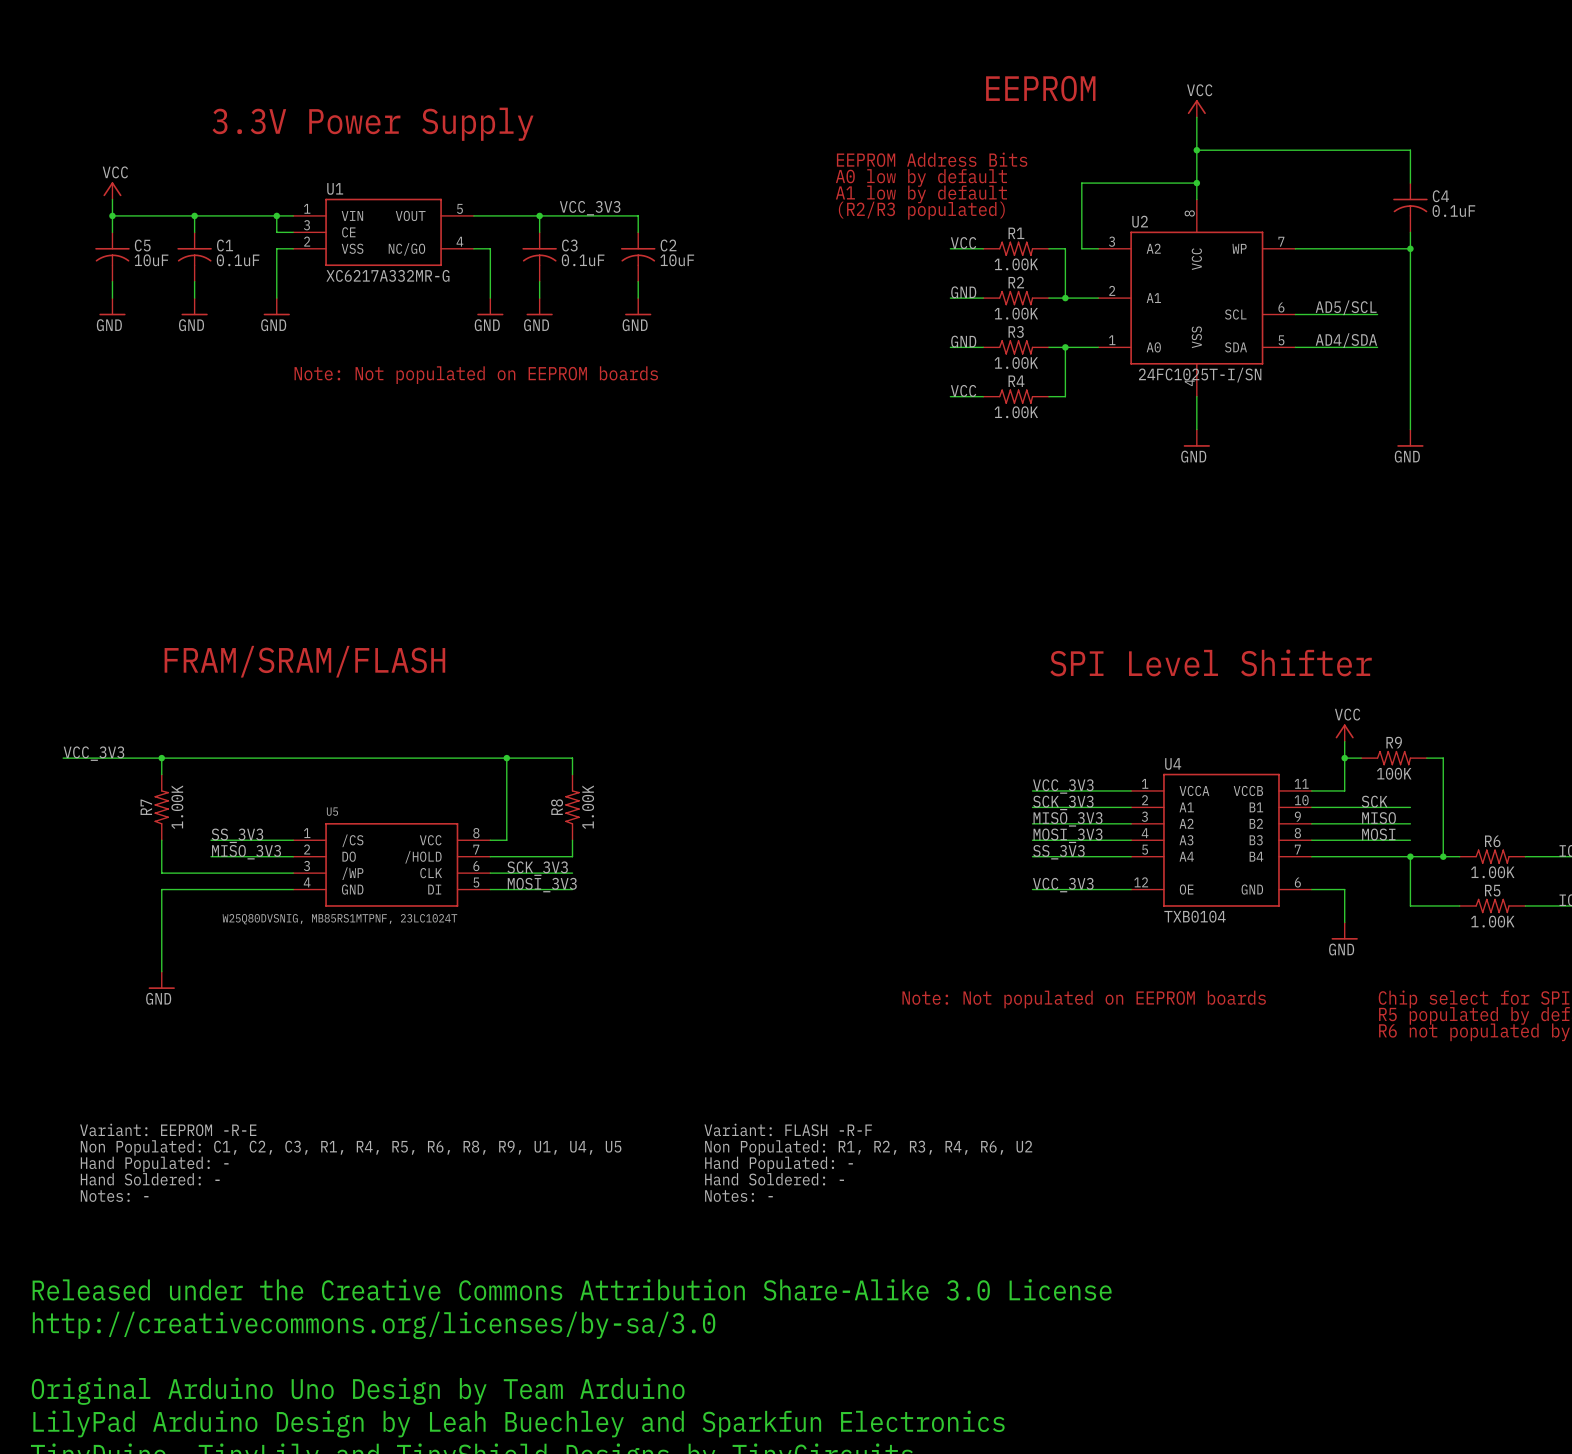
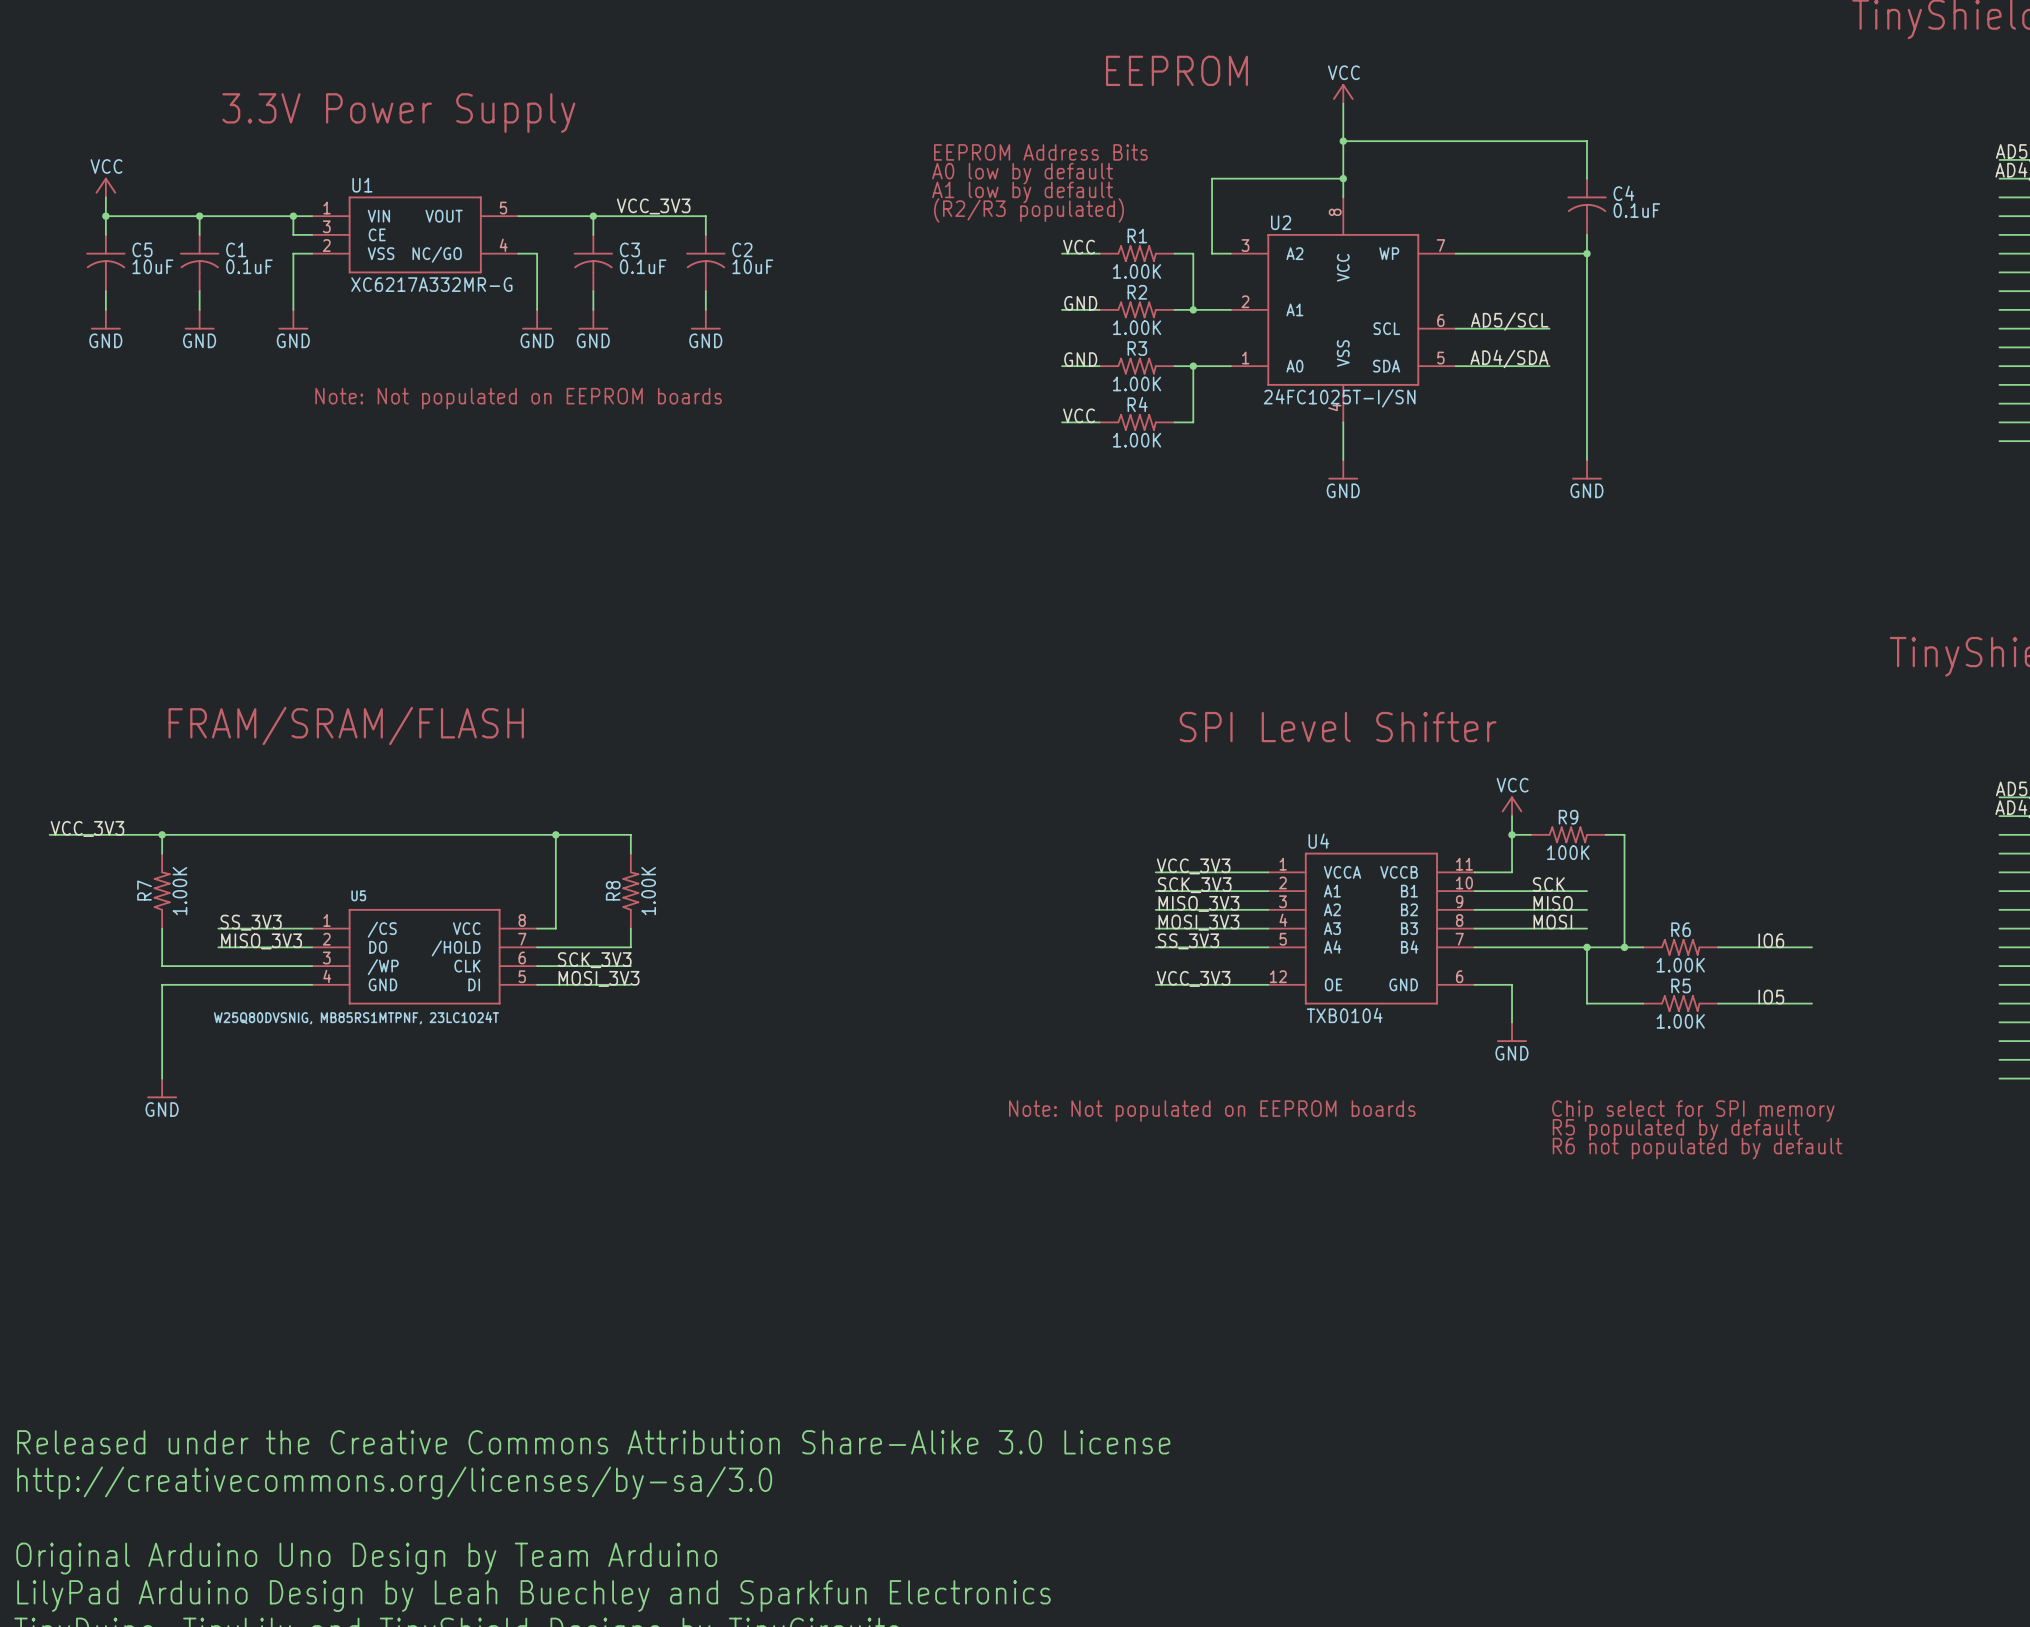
text: Variant: EEPROM -R-E (168, 1129) -> none
text: Variant: FLASH -R-F (788, 1129) -> none
text: Non Populated: C1, C2, C3, R1, R4, R5, R6, R8, R9, U1, U4, U5 (351, 1147) -> none
text: Non Populated: R1, R2, R3, R4, R6, U2 (868, 1147) -> none
text: Hand Populated: - (154, 1164) -> none
text: Hand Populated: - (779, 1164) -> none
text: Hand Soldered: - (150, 1179) -> none
text: Hand Soldered: - (774, 1179) -> none
text: Notes: - (114, 1196) -> none
text: Notes: - (738, 1196) -> none

